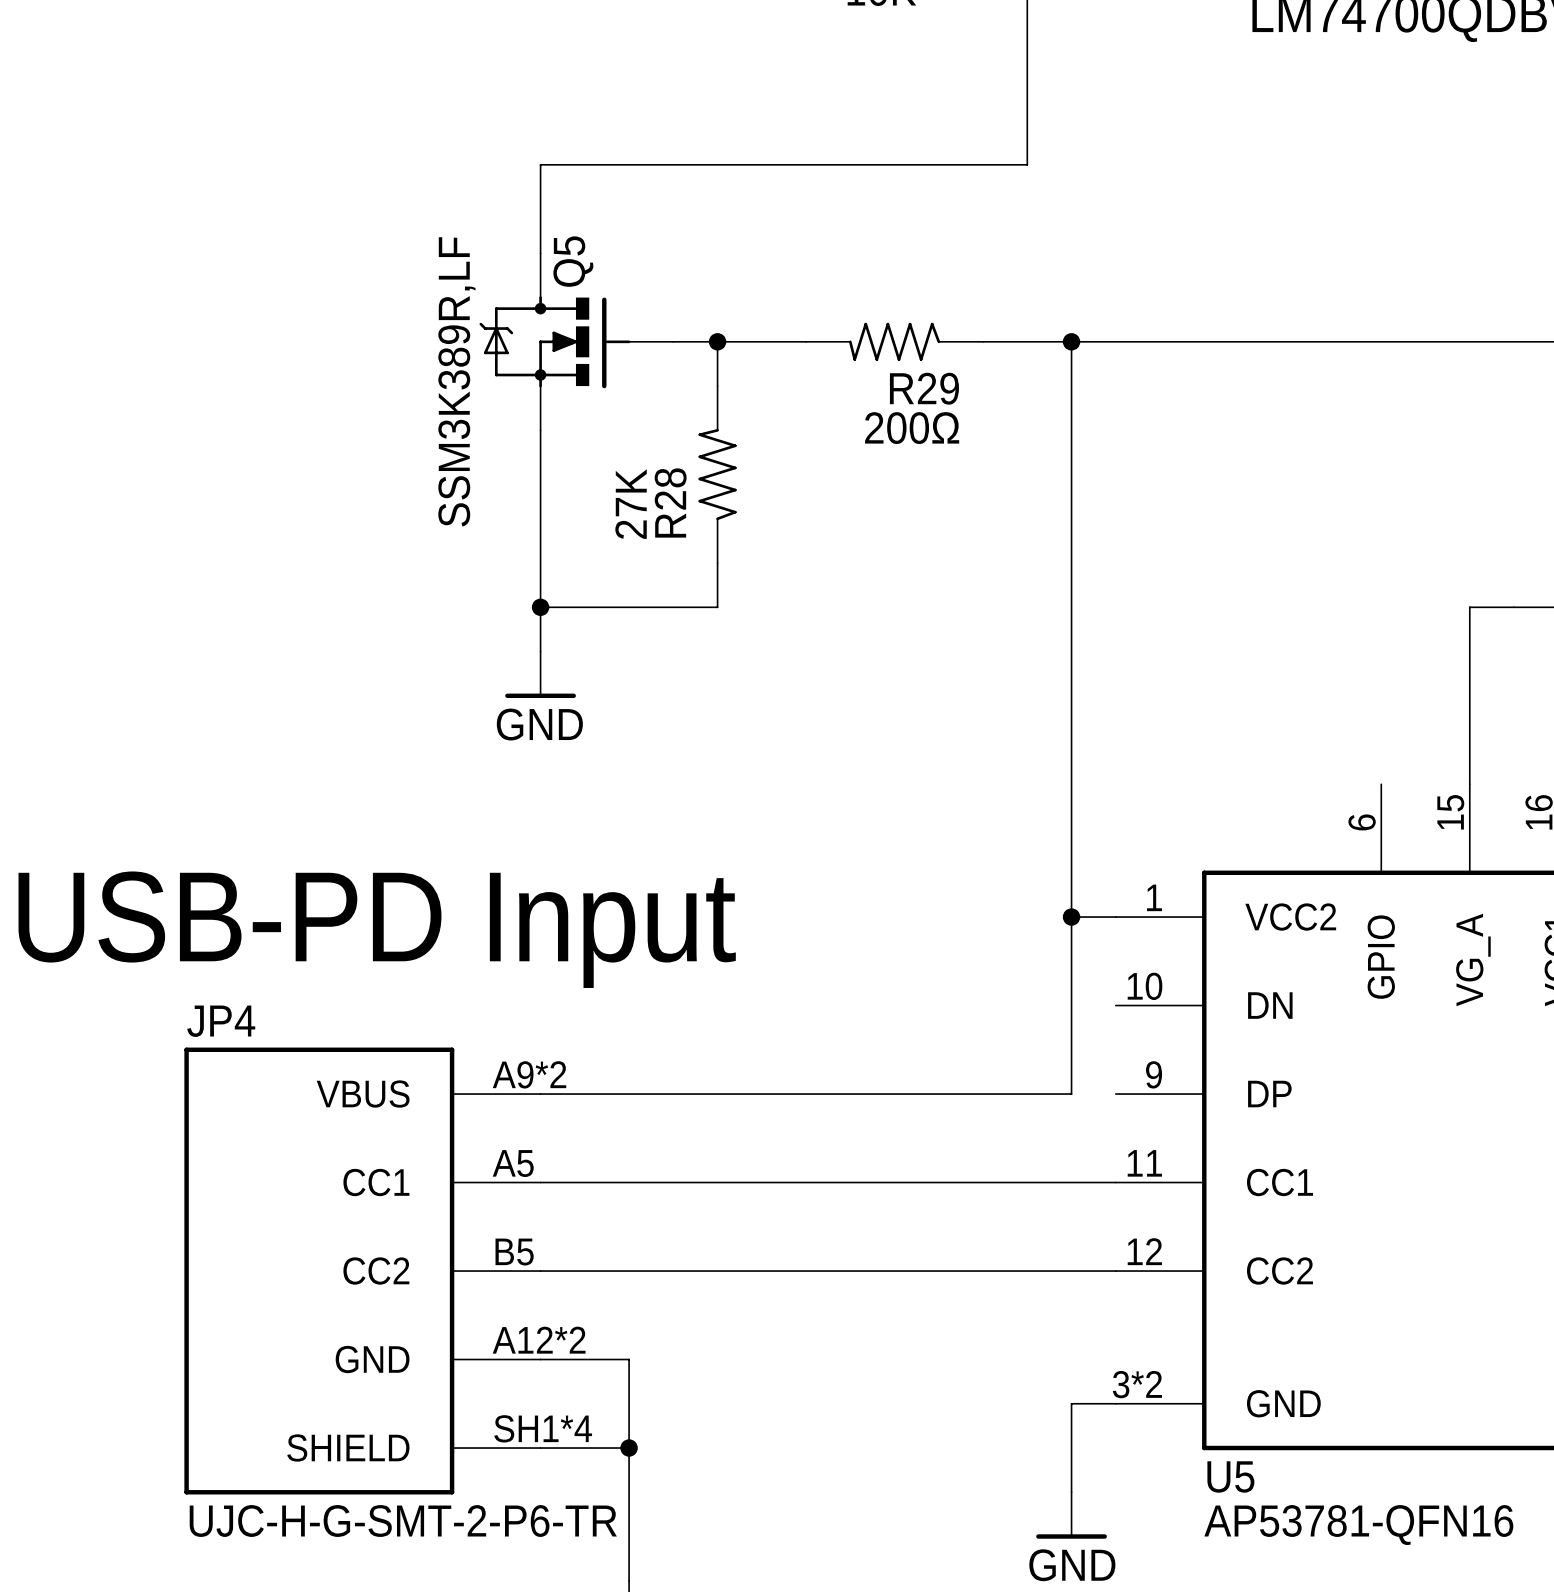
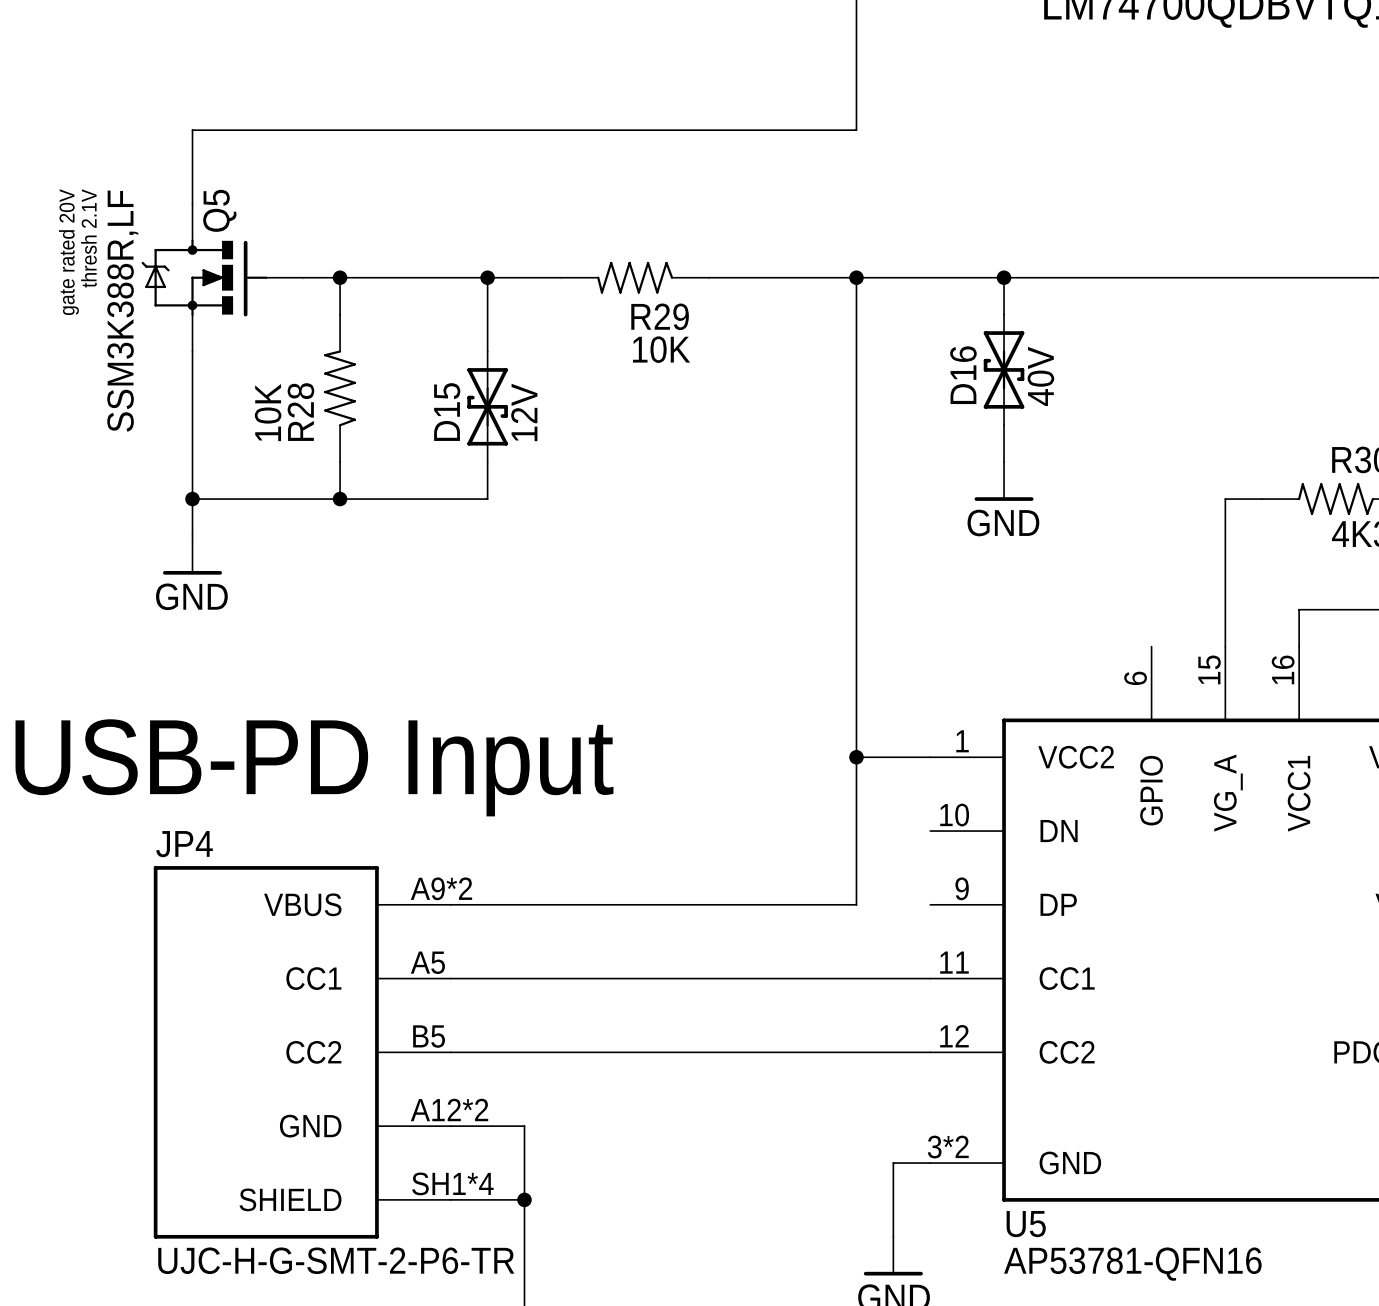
wire: (540, 164) (540, 253) -> (450, 130) (192, 130) (192, 203)
text: none -> thresh 2.1V (88, 238)
text: none -> gate rated 20V (68, 252)
junction: none -> (340, 277)
Q5 position: (576, 341) -> (222, 277)
wire: none -> (487, 277) (487, 351)
junction: none -> (487, 277)
wire: (673, 341) (806, 341) -> (561, 277) (303, 277)
wire: (717, 341) (717, 386) -> (340, 277) (340, 314)
junction: (717, 341) -> none
wire: none -> (708, 277) (819, 277)
R29 position: (894, 341) -> (635, 277)
wire: (1071, 341) (1071, 1094) (1027, 1094) -> (856, 277) (856, 904)
junction position: (1071, 341) -> (856, 277)
wire: none -> (1004, 277) (1004, 314)
junction: none -> (1004, 277)
Q5 value: SSM3K389R,LF (456, 381) -> SSM3K388R,LF (122, 311)
R29 value: 200Ω (912, 428) -> 10K (661, 349)
wire: (540, 430) (540, 651) -> (192, 351) (192, 535)
D16: none -> 40V (1004, 369)
R28 position: (717, 474) -> (340, 388)
D15: none -> 12V (487, 406)
R28 value: 27K (631, 504) -> 10K (268, 412)
wire: none -> (1004, 425) (1004, 462)
wire: none -> (340, 462) (340, 499)
wire: (717, 563) (717, 607) (584, 607) -> (487, 462) (487, 499)
power symbol: none -> GND (1004, 481)
wire: none -> (192, 499) (450, 499)
junction: none -> (192, 499)
junction: none -> (340, 499)
junction: (540, 607) -> none
power symbol position: GND (540, 674) -> GND (192, 555)
wire: none -> (856, 757) (893, 757)
junction position: (1071, 917) -> (856, 757)

